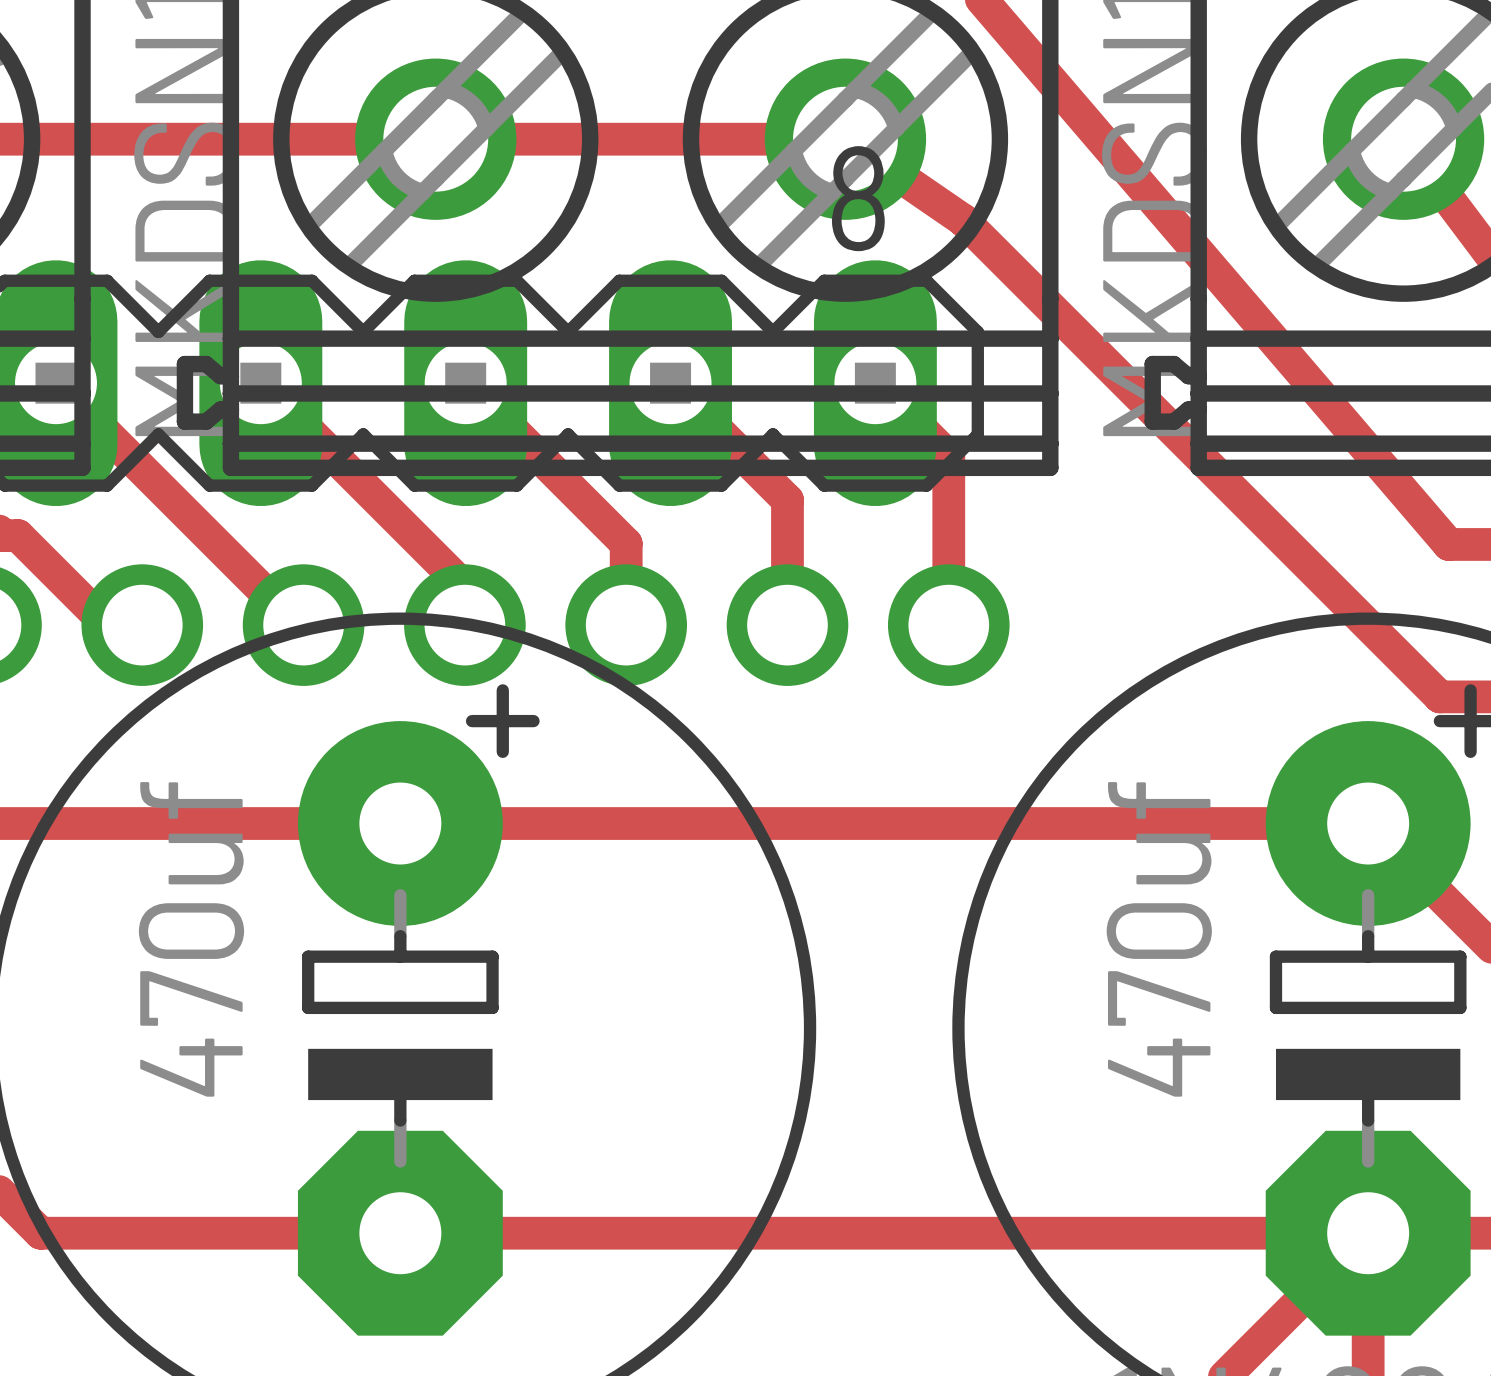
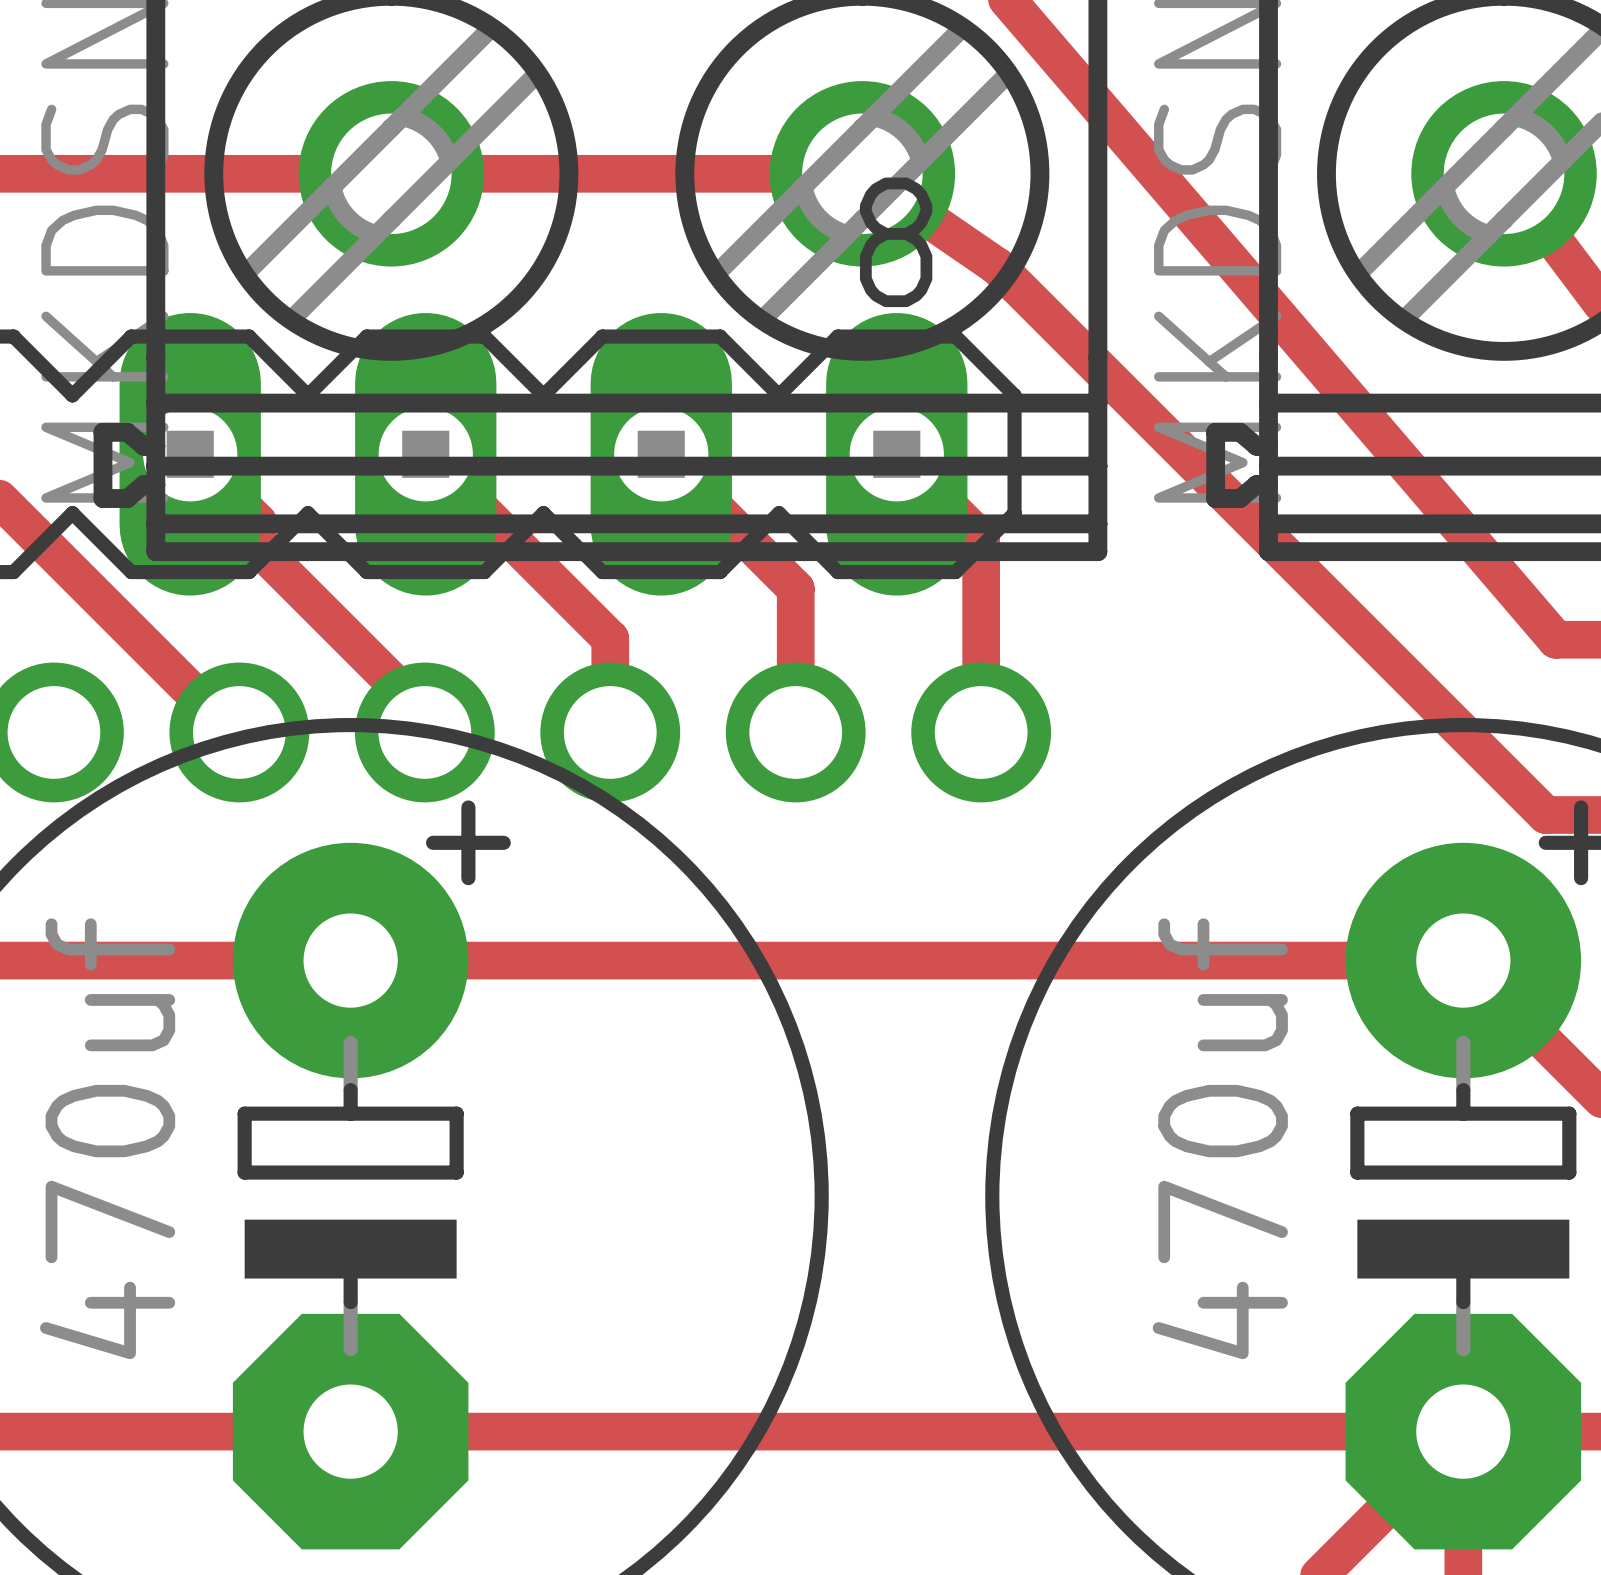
track: (319, 442) (464, 587) (464, 608) -> (257, 521) (257, 547) (424, 713)

